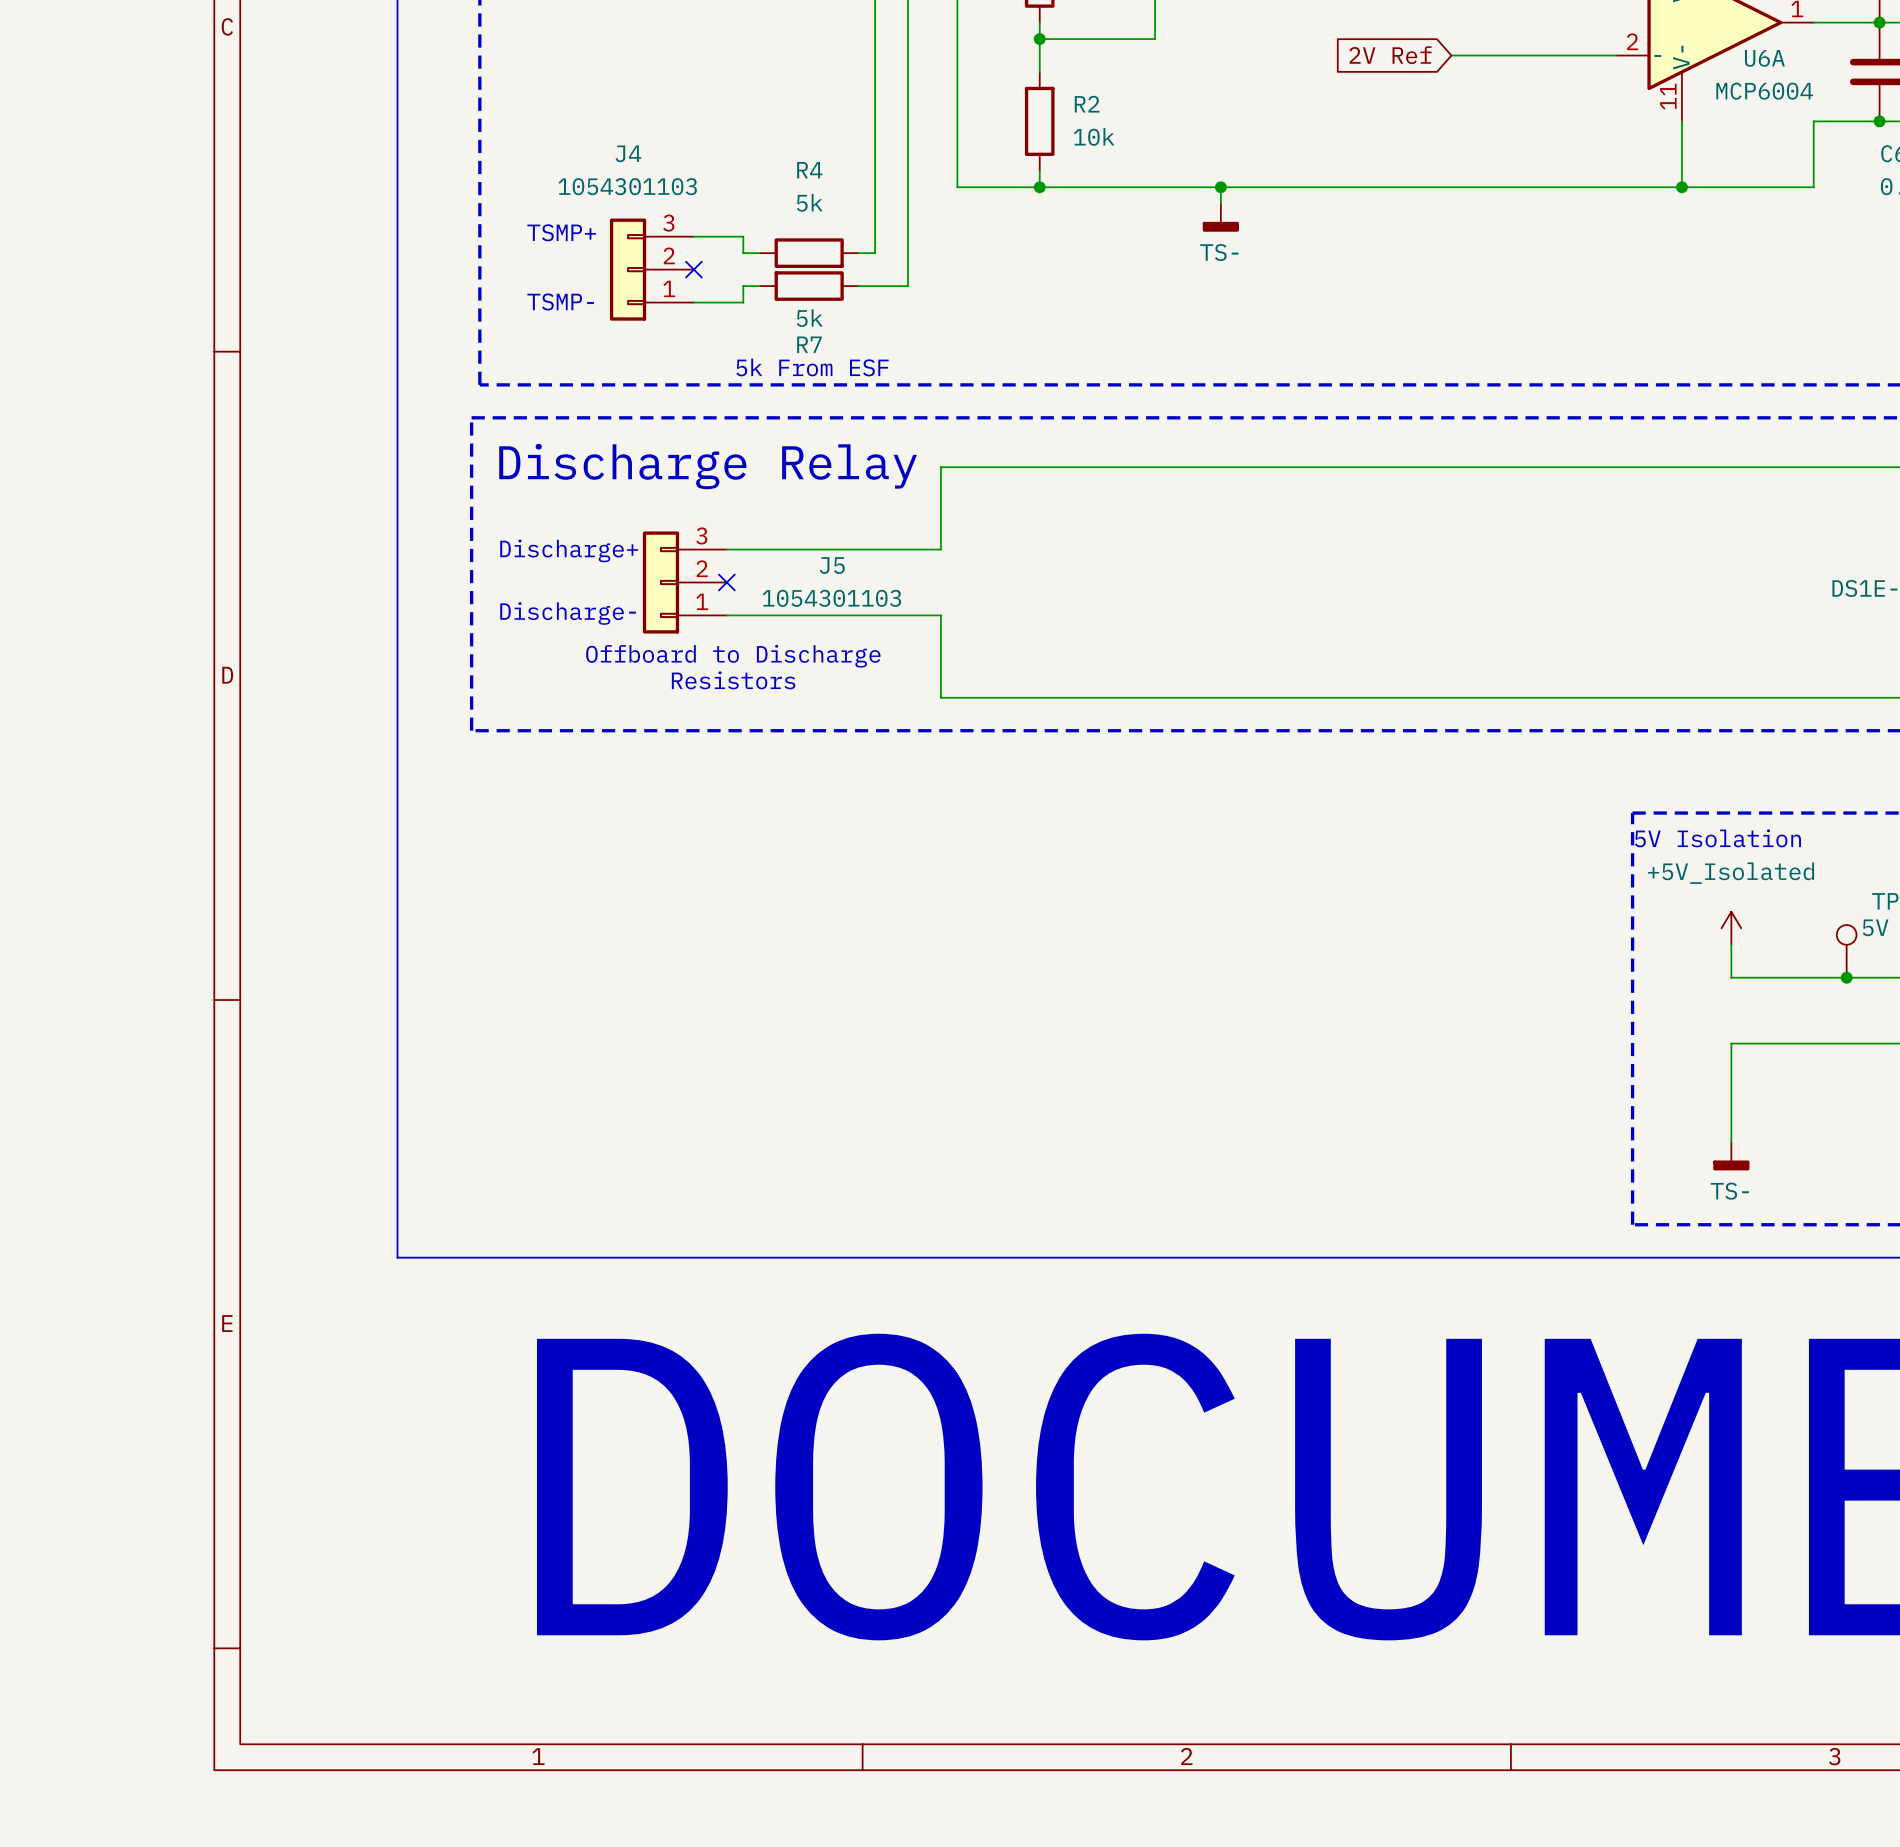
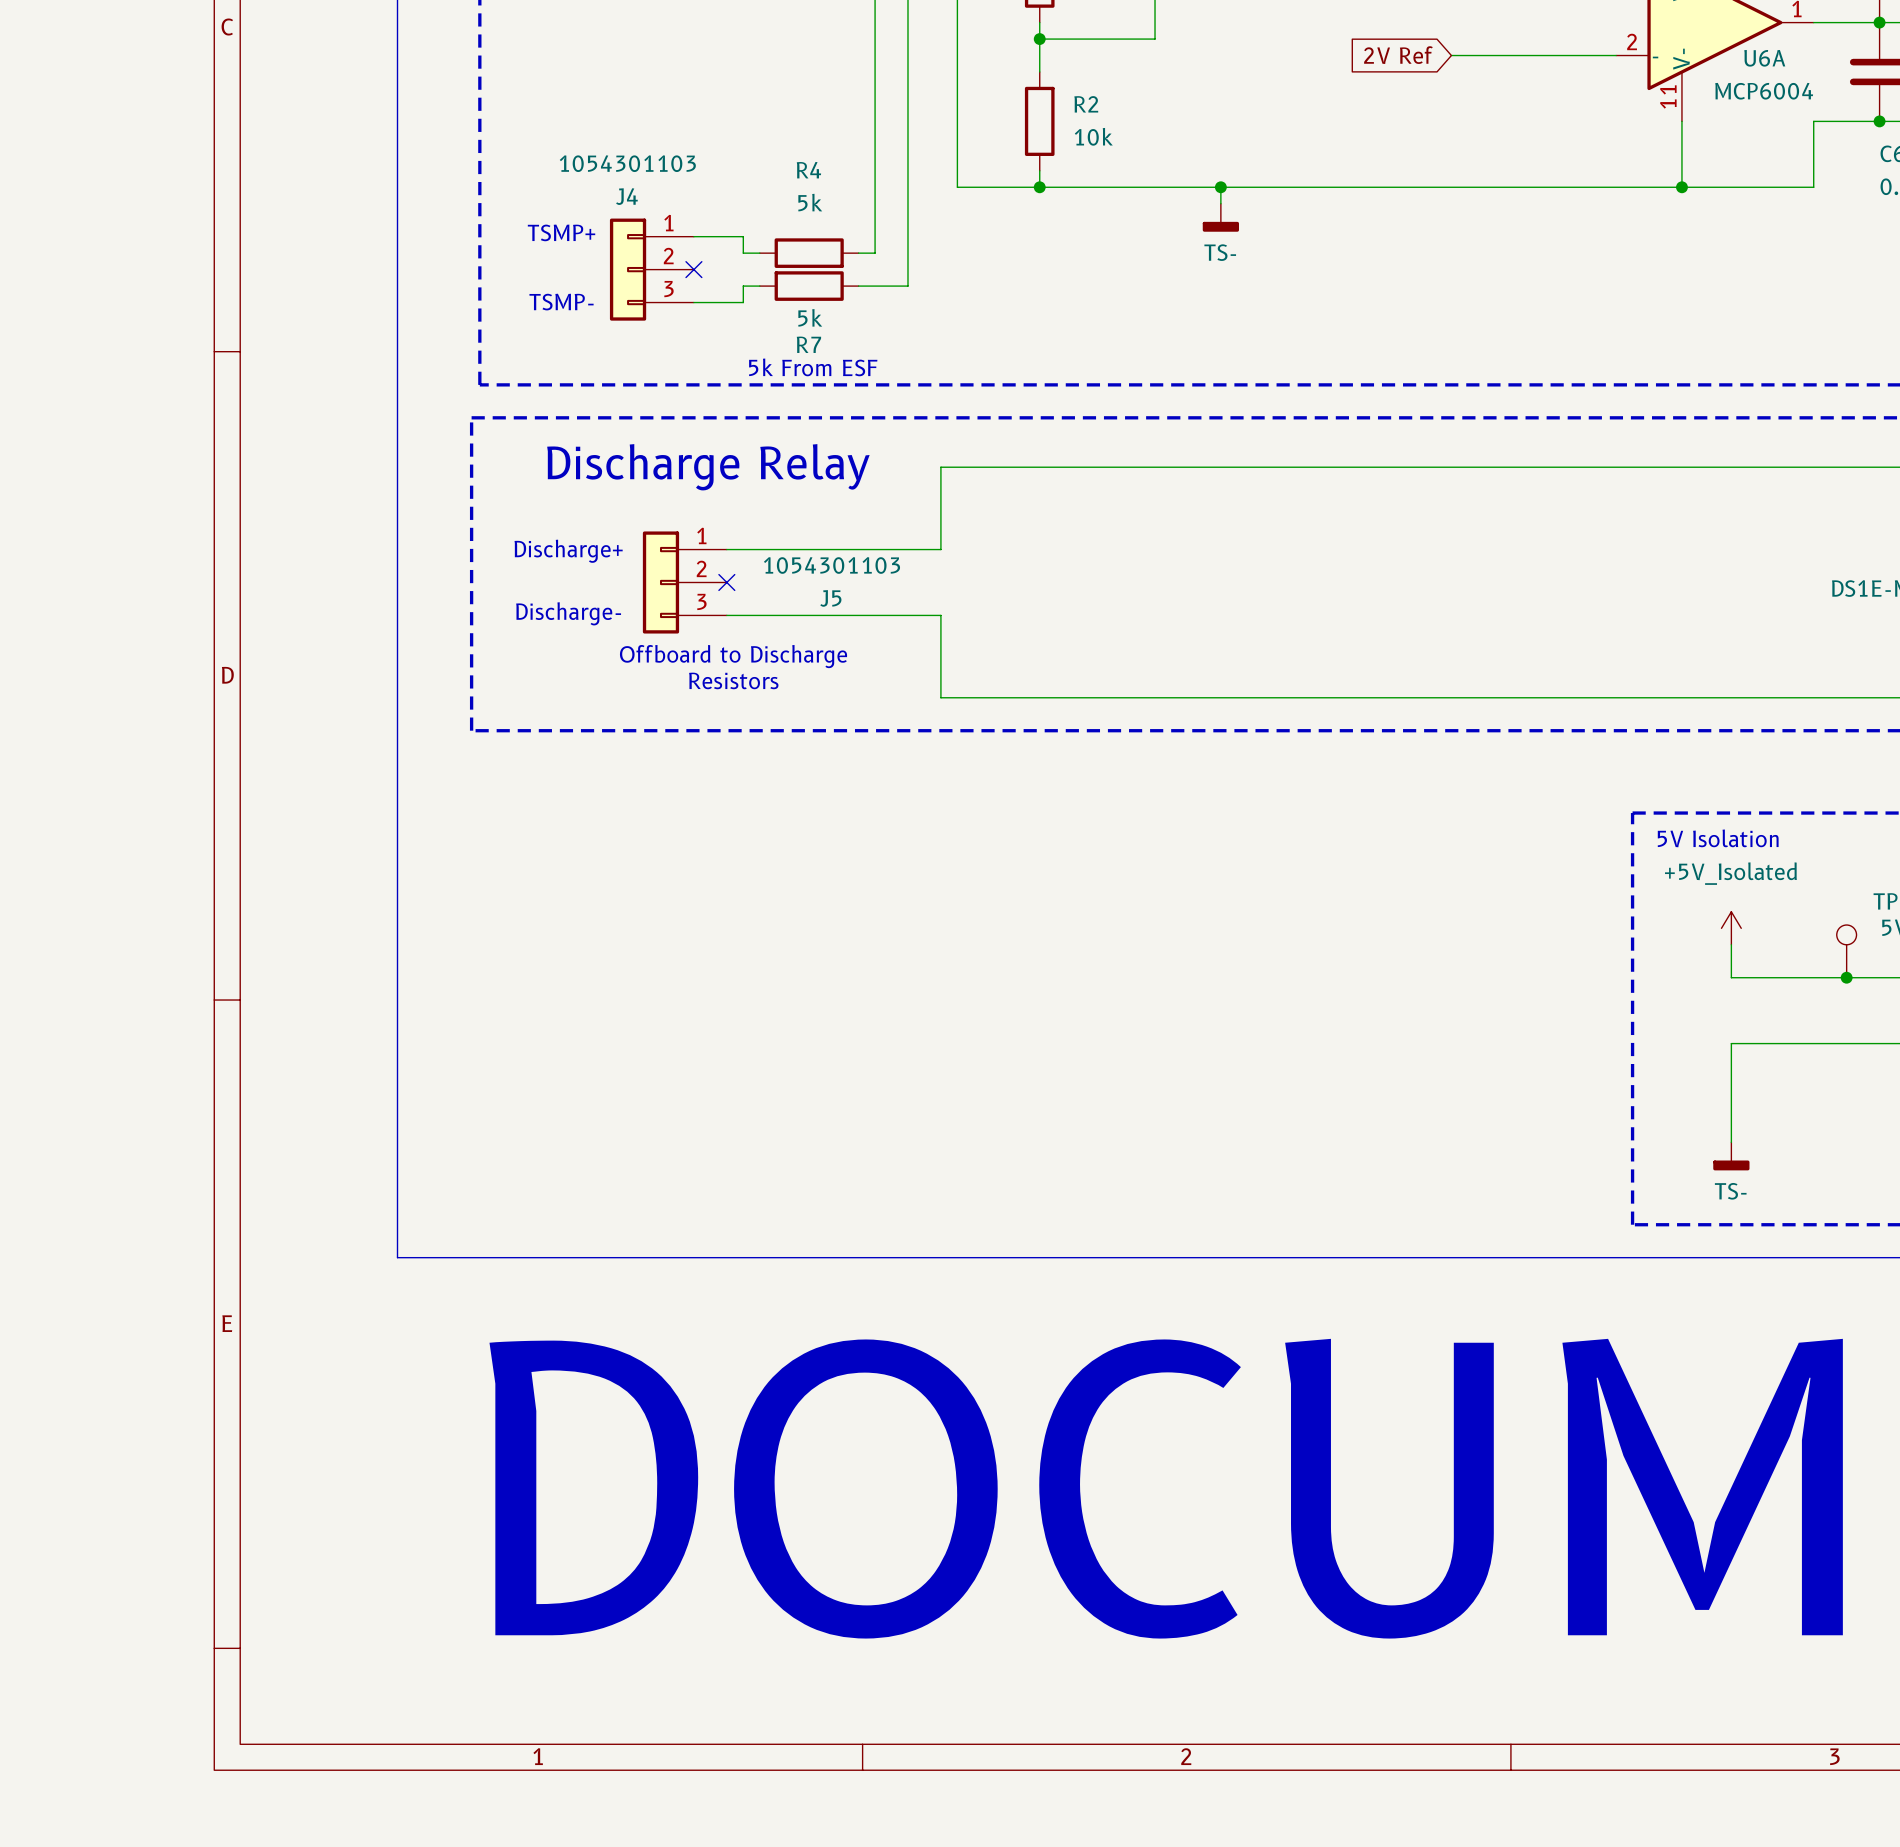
J4 name position: J4 (628, 153) -> J4 (626, 196)
J4 flip: as is (628, 269) -> up-down (628, 269)
J5 flip: as is (660, 582) -> up-down (660, 582)

